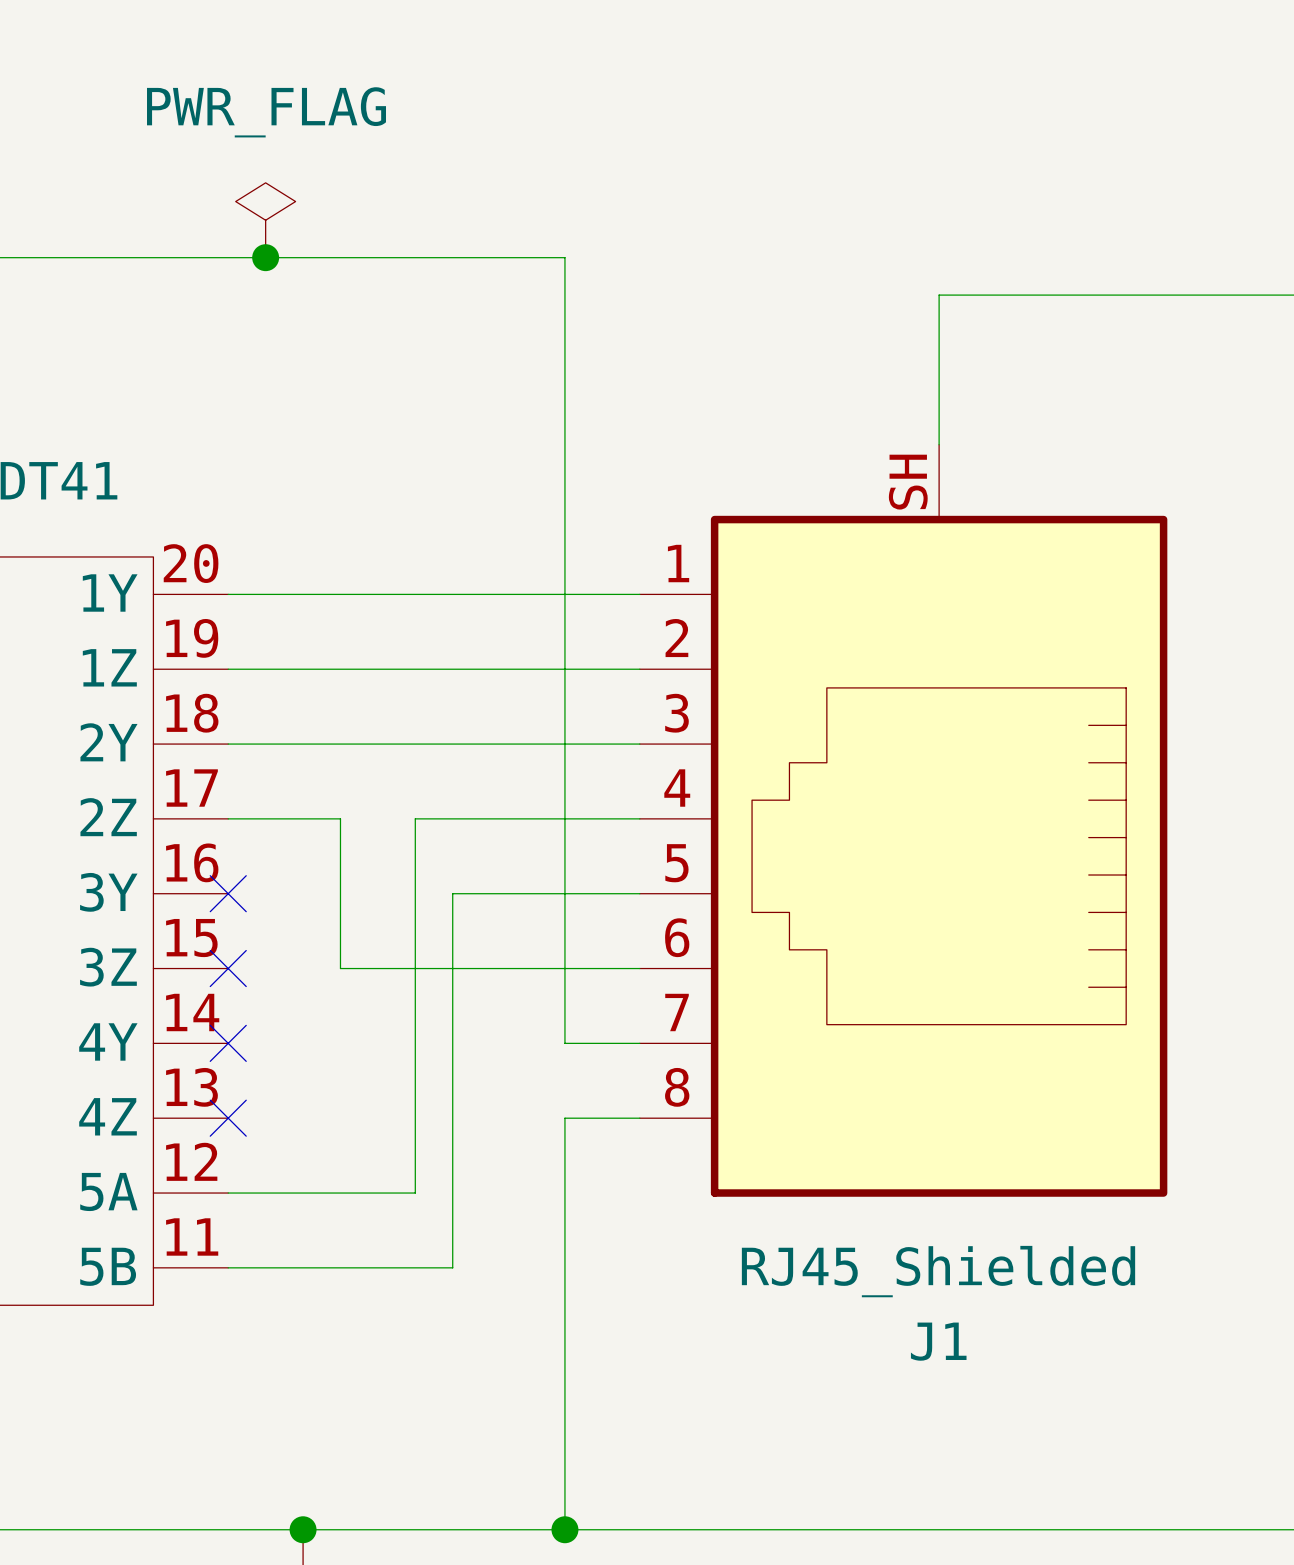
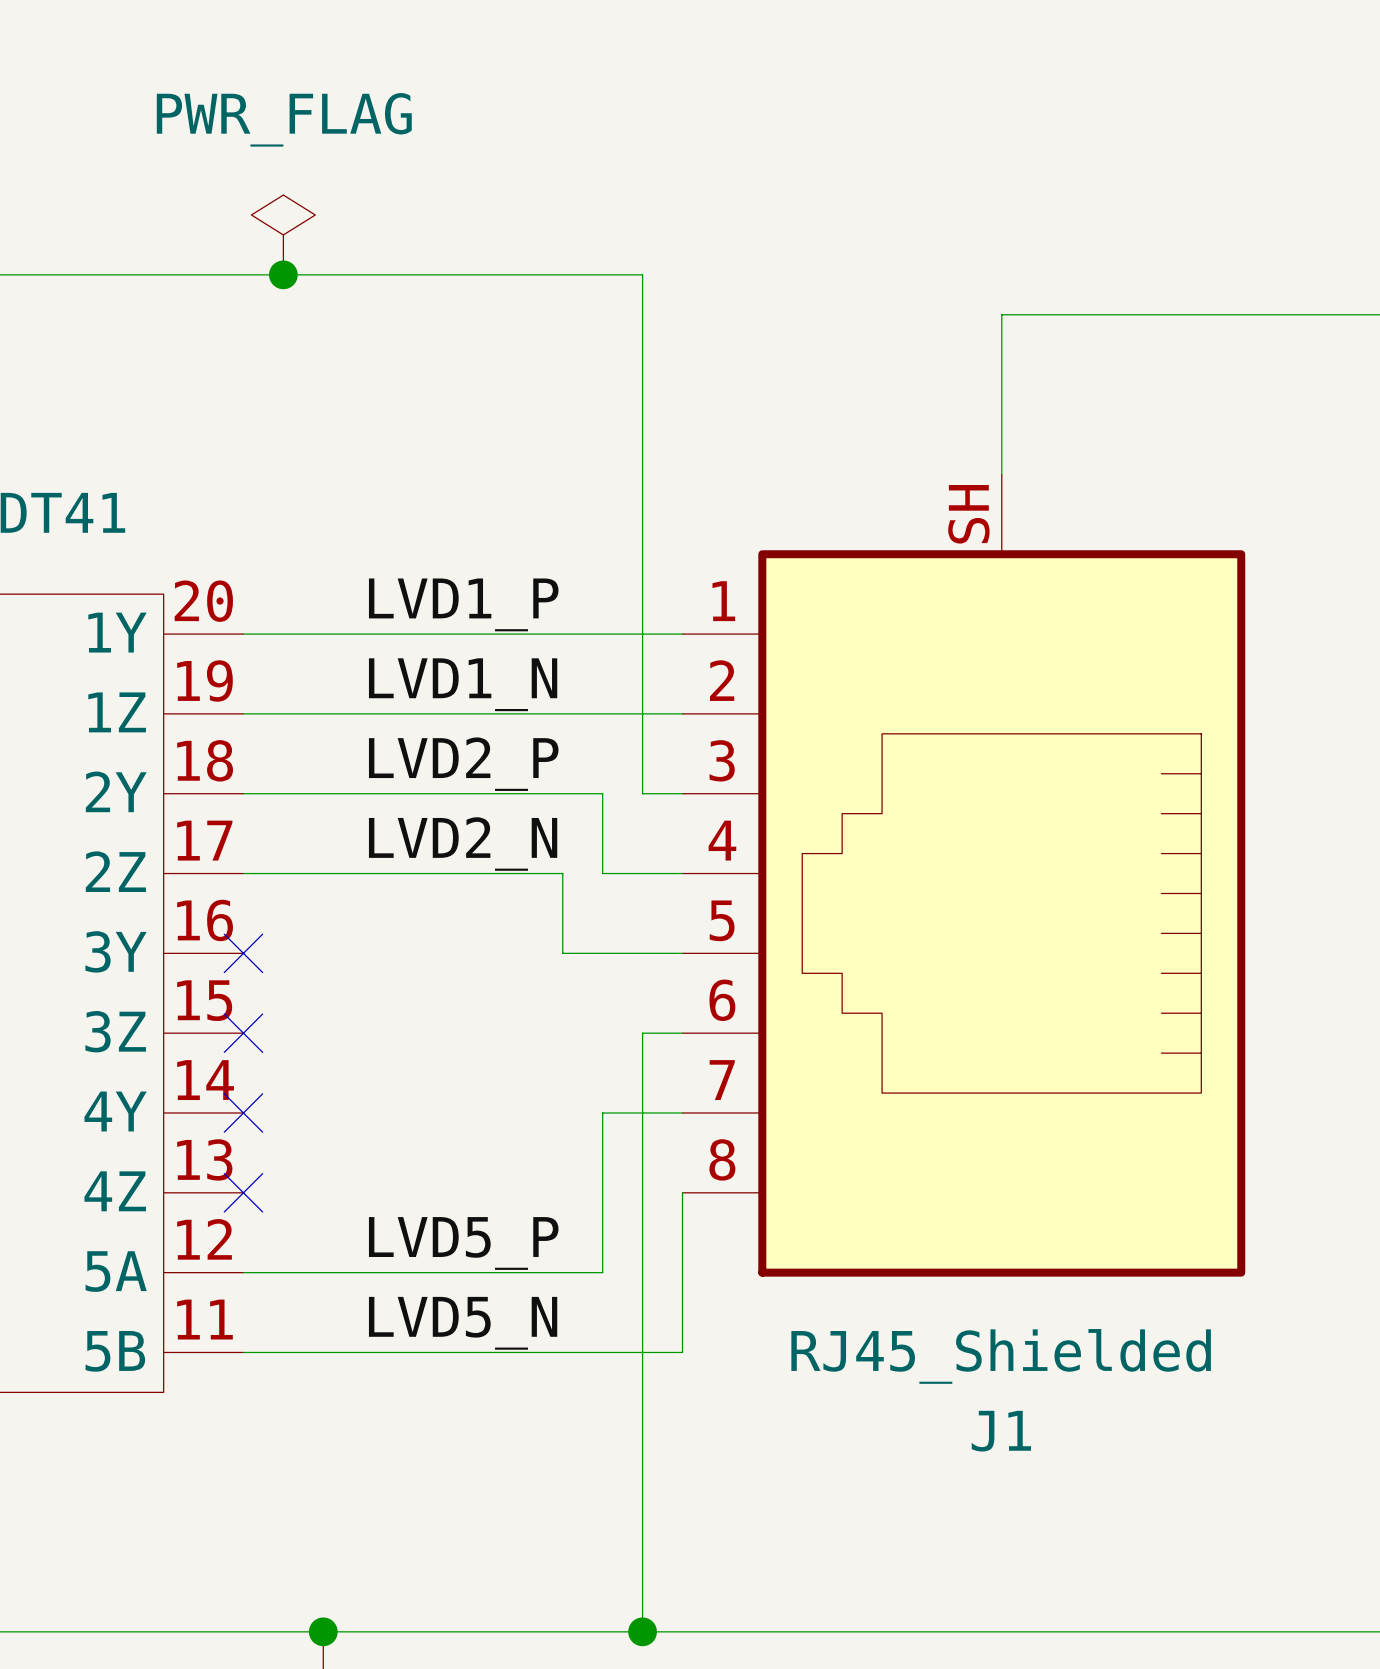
wire: (564, 257) (564, 744) (602, 744) -> (602, 274) (642, 274) (642, 793)
label: none -> LVD1_P (463, 604)
label: none -> LVD1_N (463, 684)
label: none -> LVD2_P (463, 764)
label: none -> LVD2_N (463, 844)
wire: (340, 818) (340, 968) (602, 968) -> (363, 873) (443, 873)
wire: (415, 818) (415, 1193) -> none
wire: (527, 818) (564, 818) (564, 1043) -> (562, 873) (562, 953)
wire: (527, 893) (452, 893) (452, 1267) -> (682, 1192) (682, 1352) (482, 1352)
wire: none -> (642, 1033) (642, 1631)
wire: (564, 1118) (639, 1118) -> (602, 1192) (602, 1113)
label: none -> LVD5_P (463, 1243)
wire: (564, 1193) (564, 1529) -> (602, 1272) (443, 1272)
label: none -> LVD5_N (463, 1323)
junction position: (564, 1529) -> (642, 1631)

